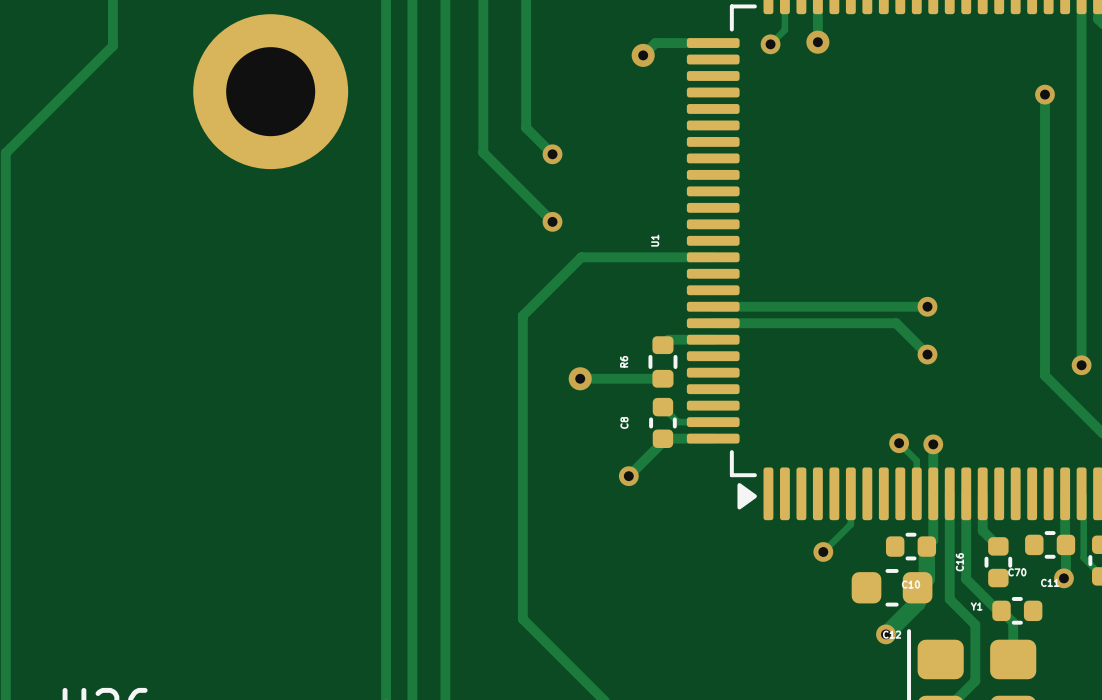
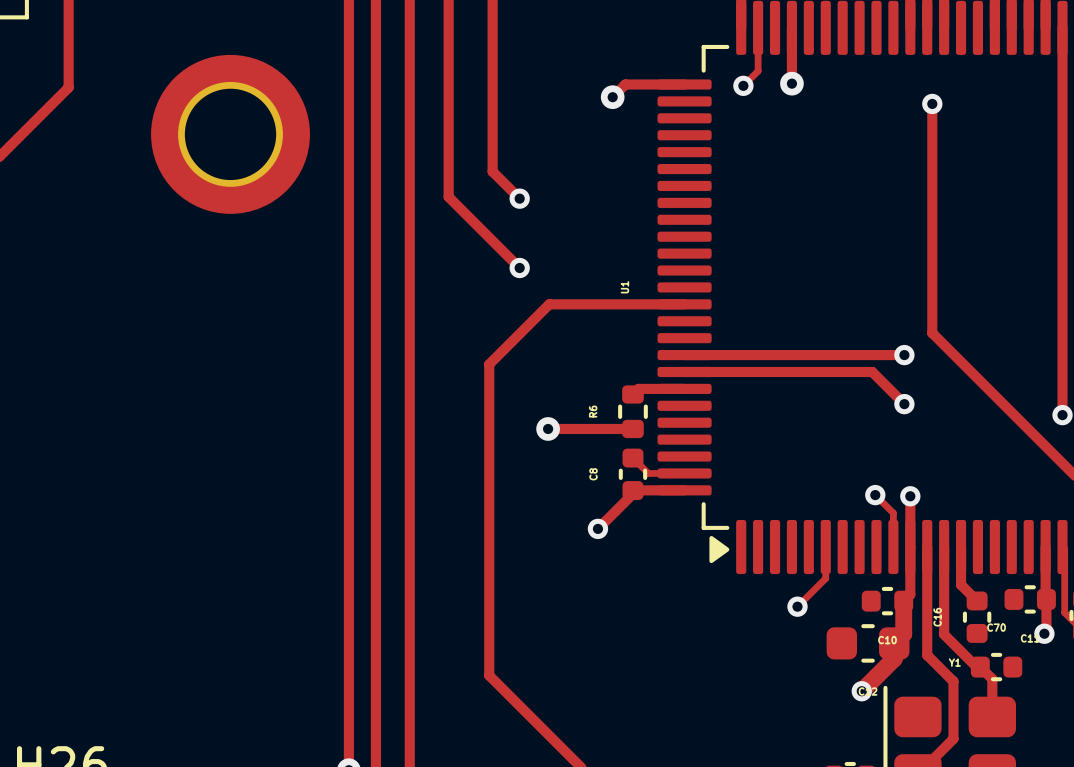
track: (1045, 94) (1045, 375) -> (932, 103) (932, 333) (1024, 425)
via position: (1045, 94) -> (932, 103)

